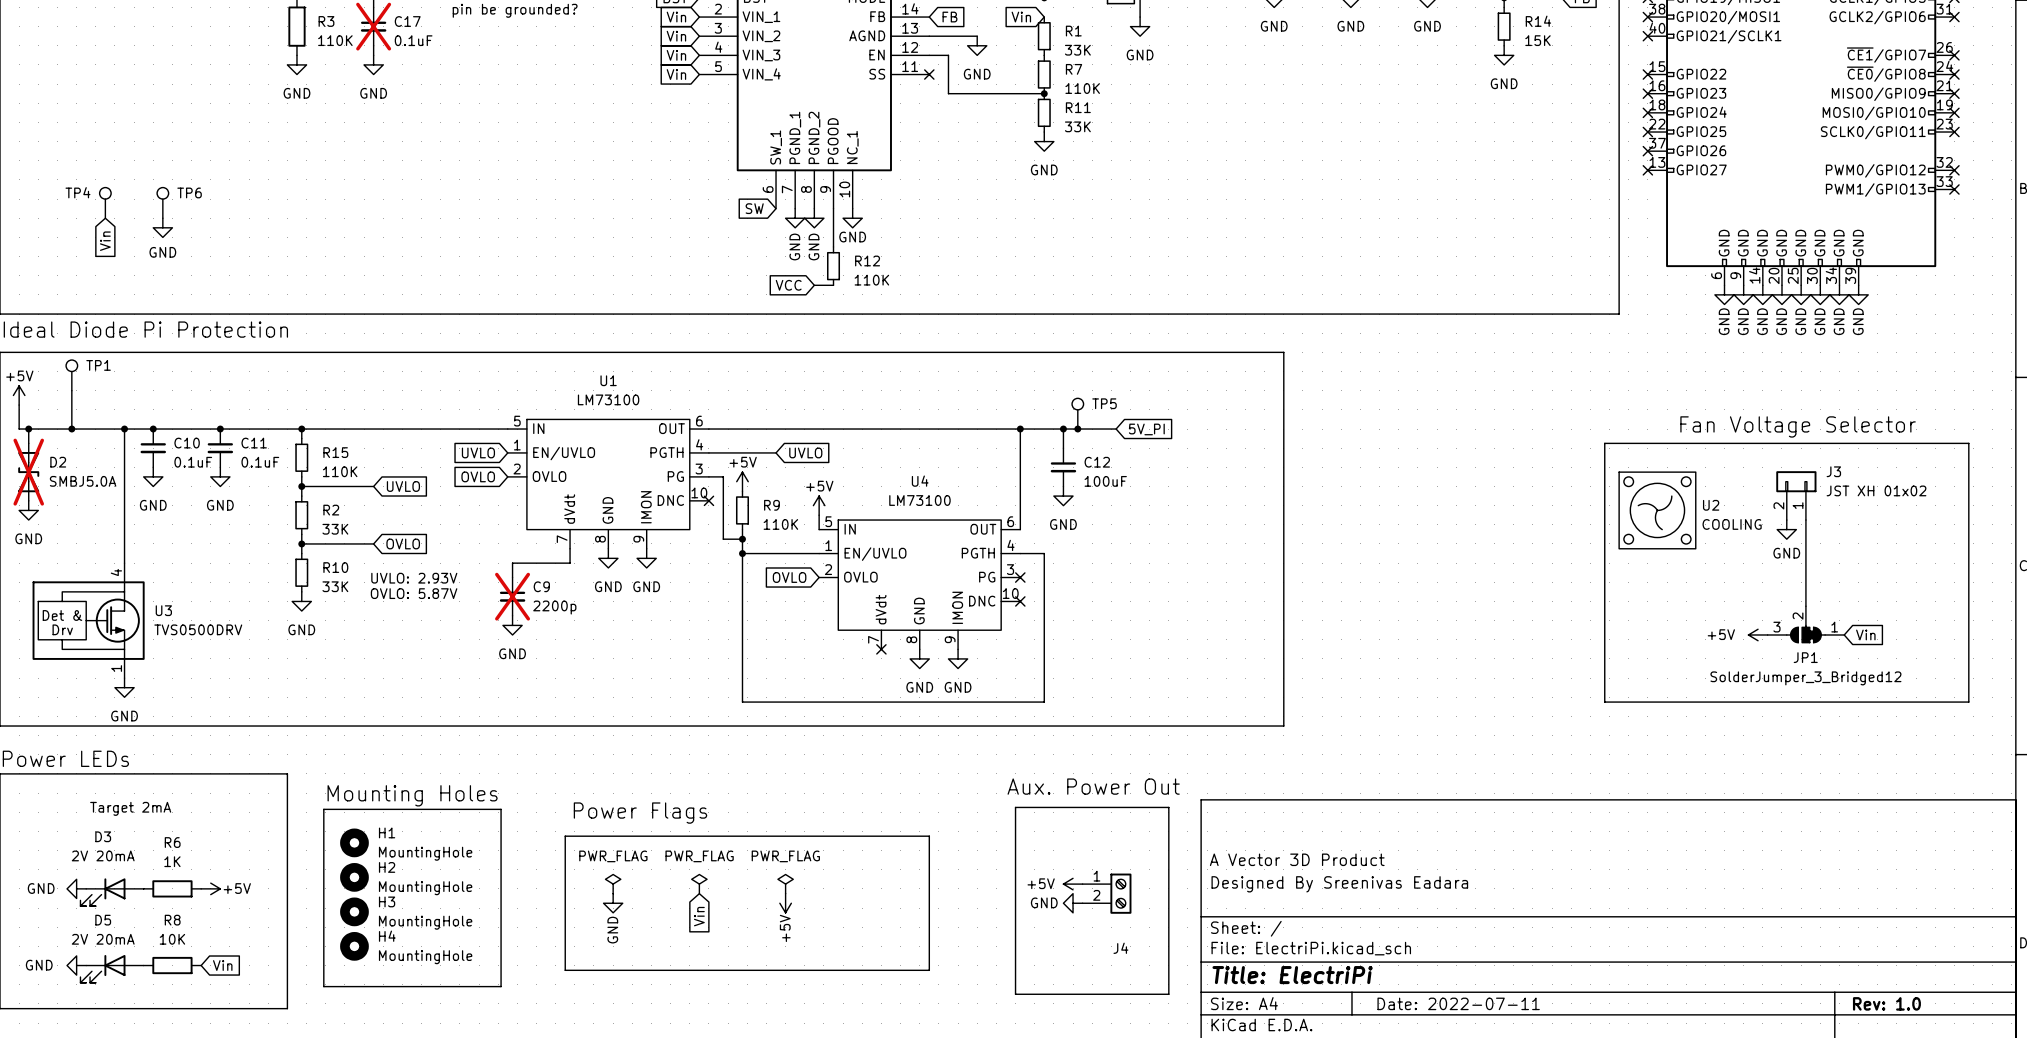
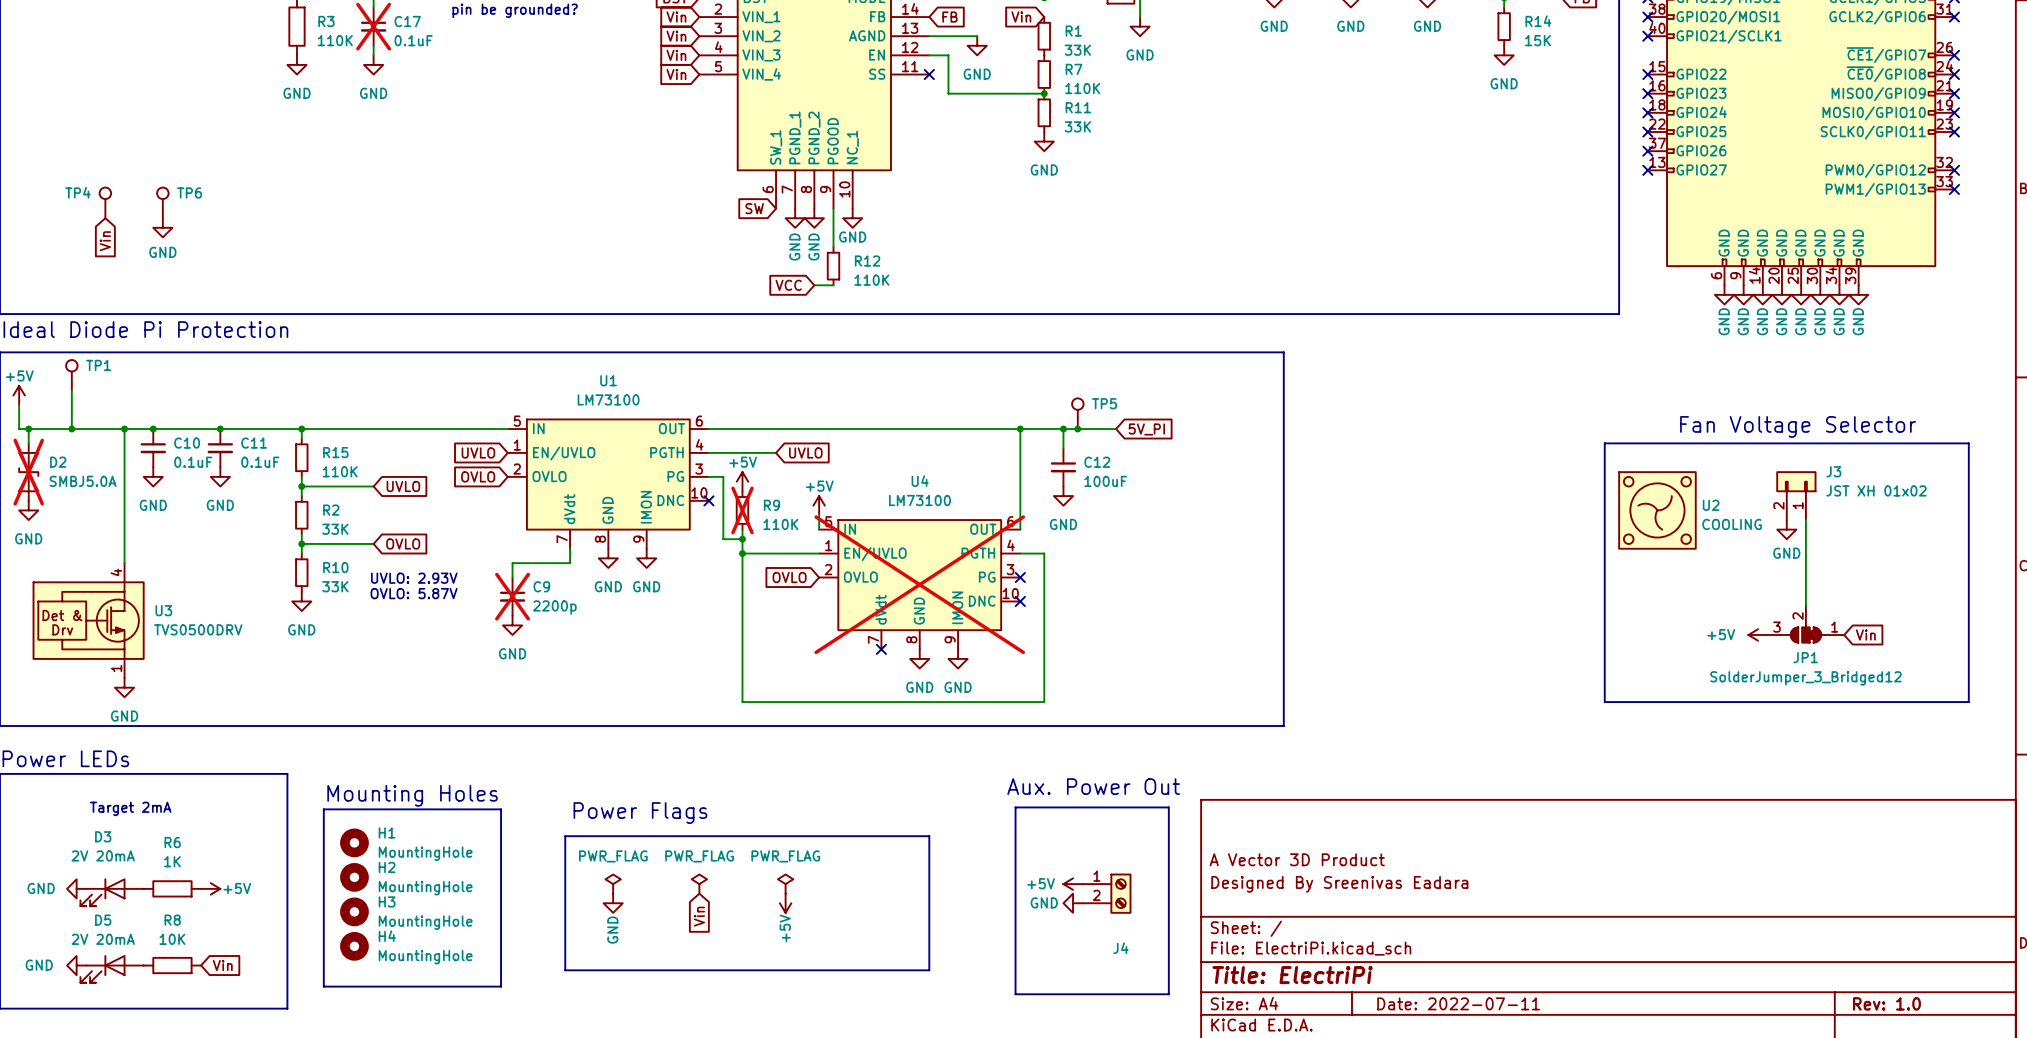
R9 do-not-place cross: none -> (742, 510)
U4 do-not-place cross: none -> (919, 584)

